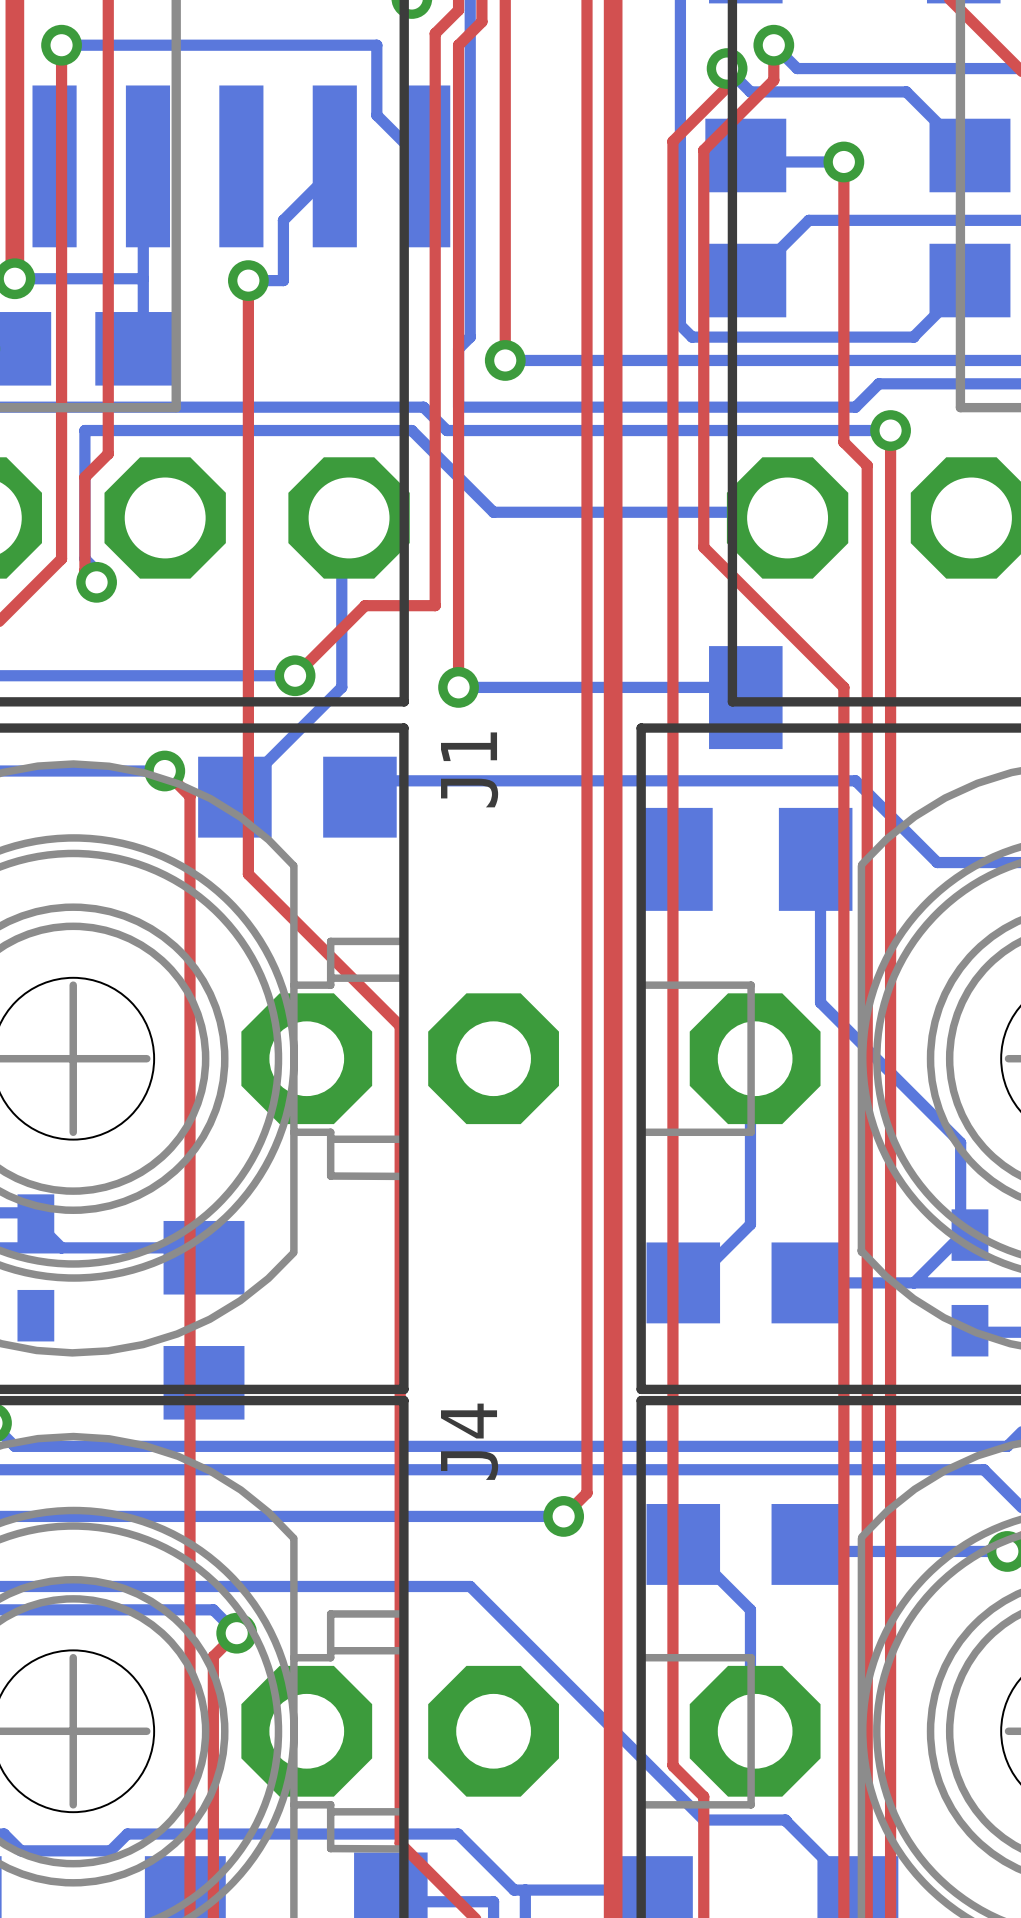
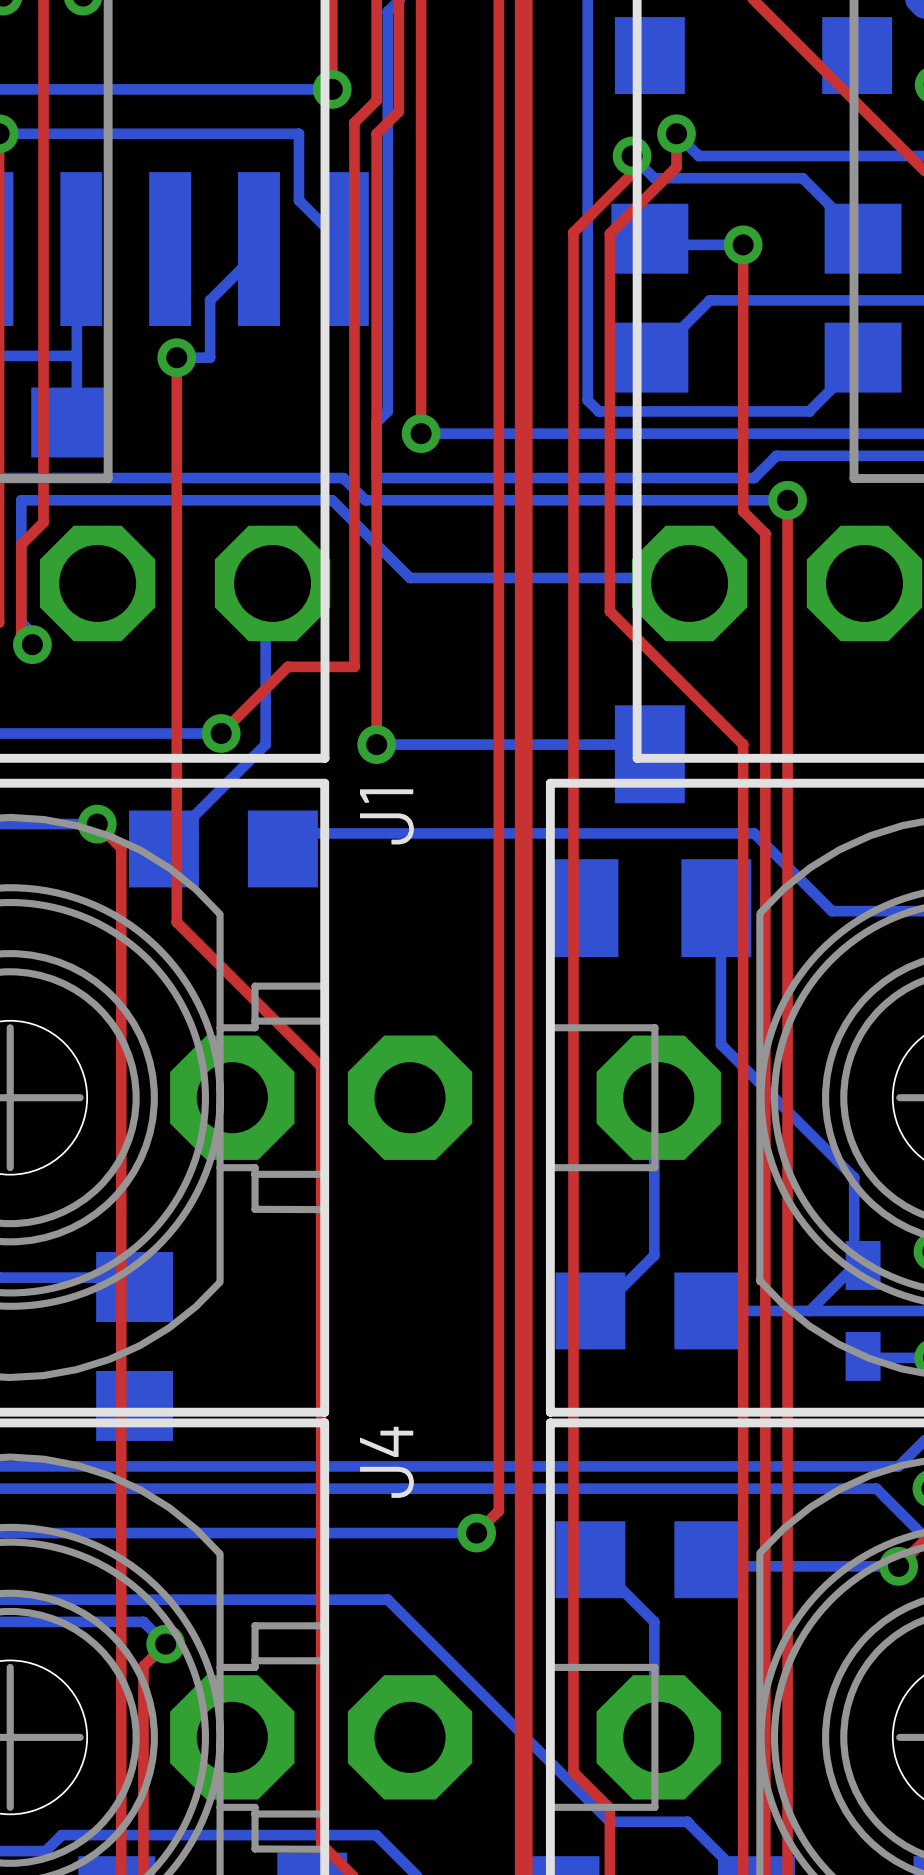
top track: (672, 141) (672, 1765) -> (580, 225) (573, 232) (573, 1772) (609, 1808)
top track: (673, 1766) (703, 1796) (703, 1806) -> none

